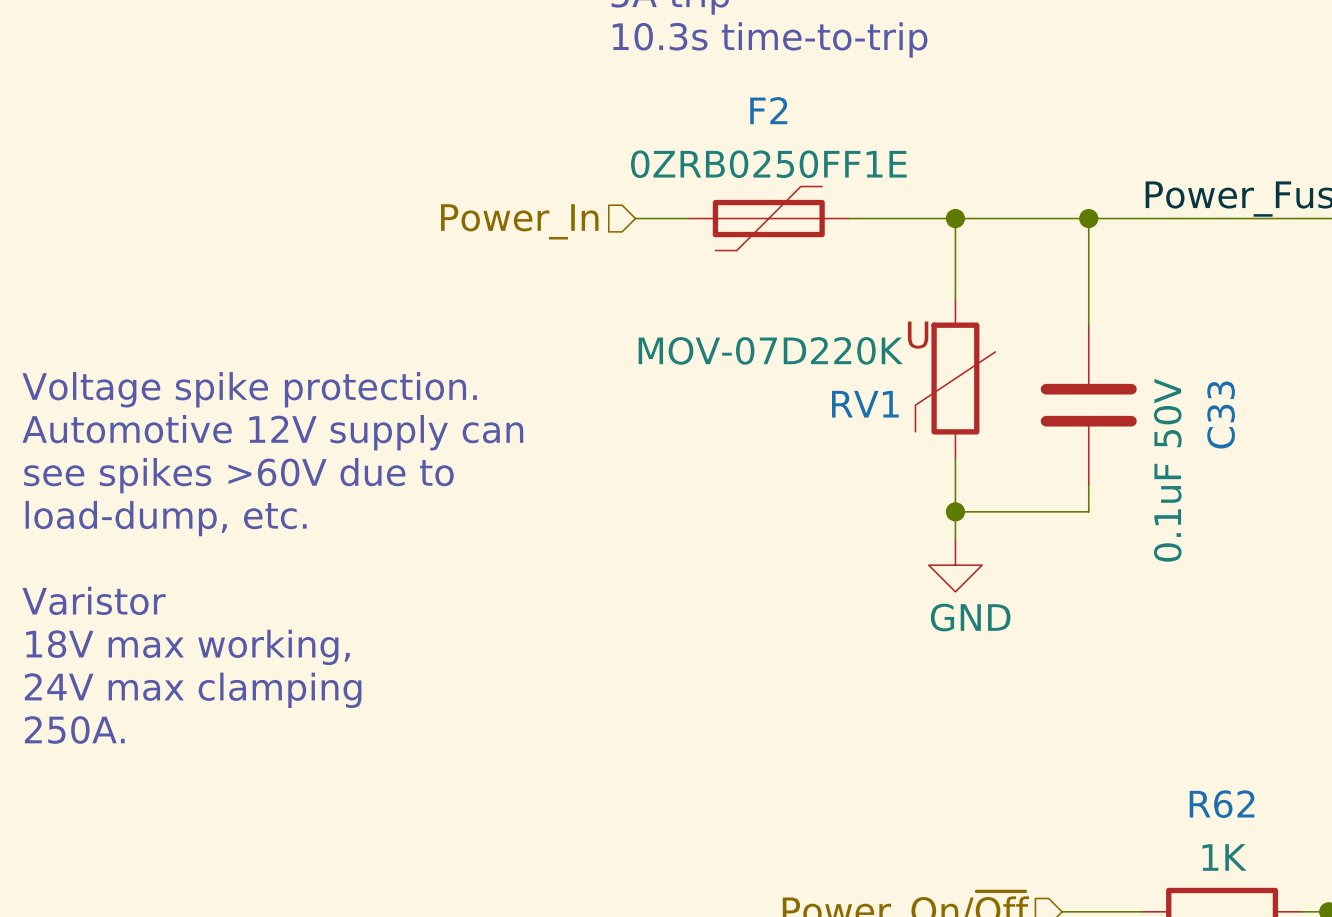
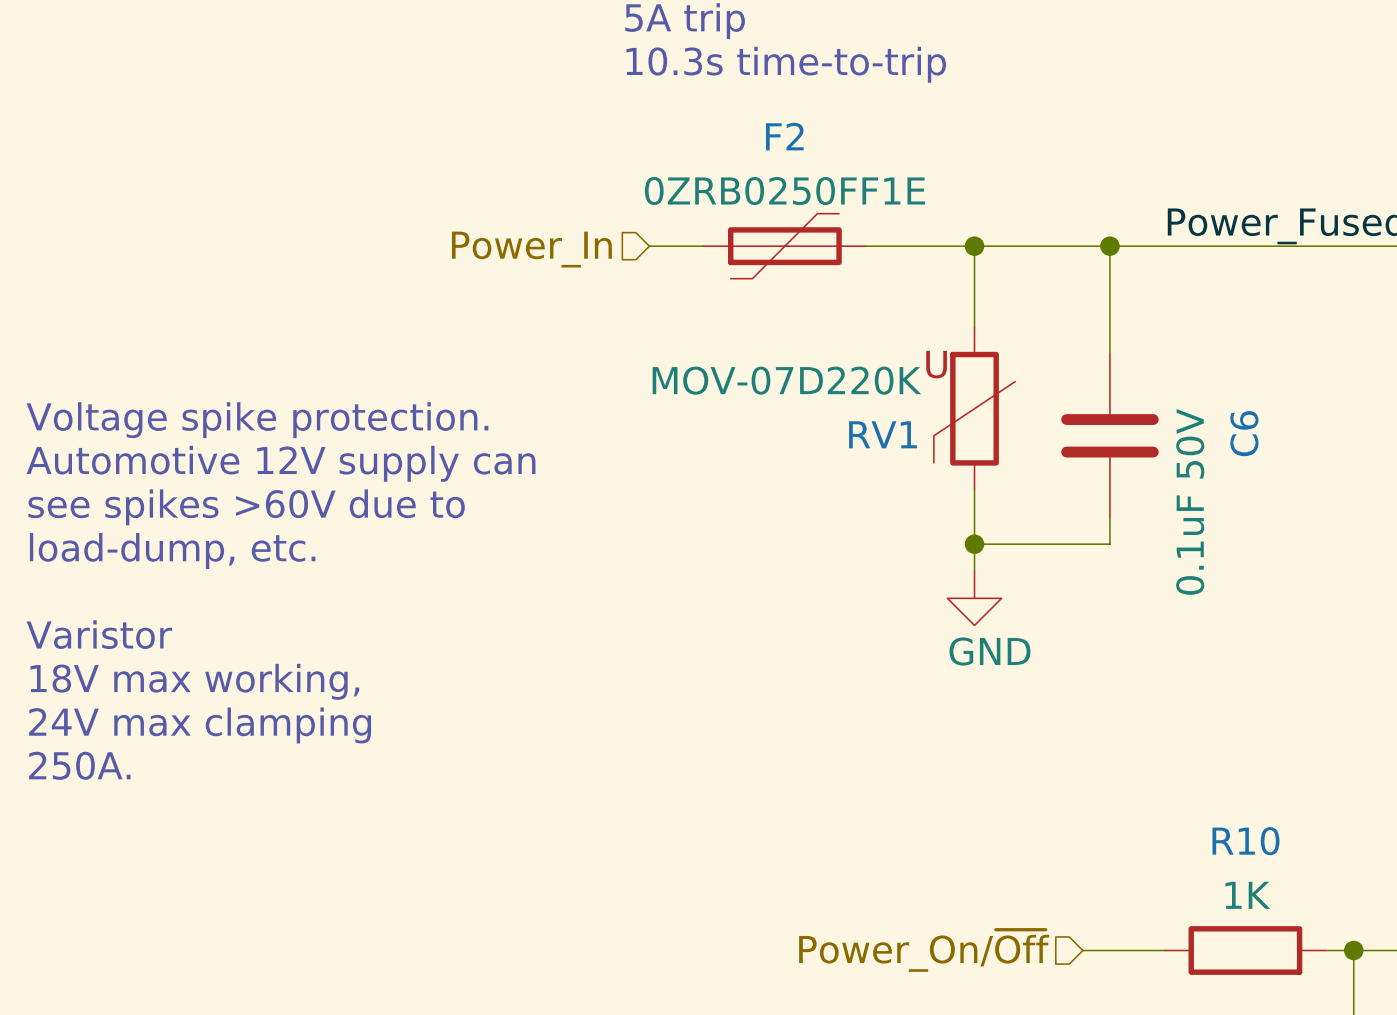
C33 name: C33 (1221, 415) -> C6 (1244, 433)
R62 name: R62 (1222, 804) -> R10 (1246, 841)

